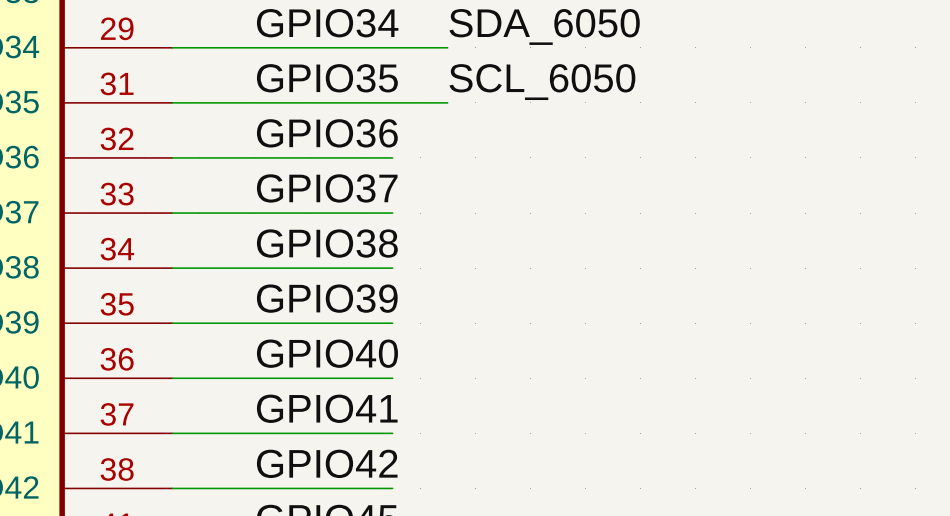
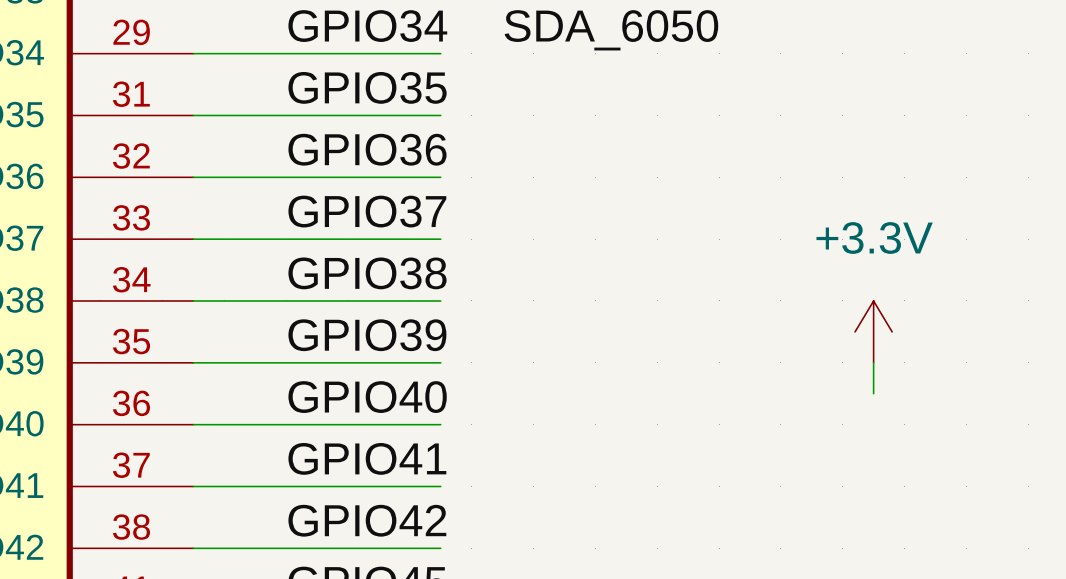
wire: (392, 47) (447, 47) -> none
label: SCL_6050 (542, 82) -> none
wire: (392, 102) (447, 102) -> none
power symbol: none -> +3.3V (873, 331)
wire: none -> (873, 362) (873, 393)

